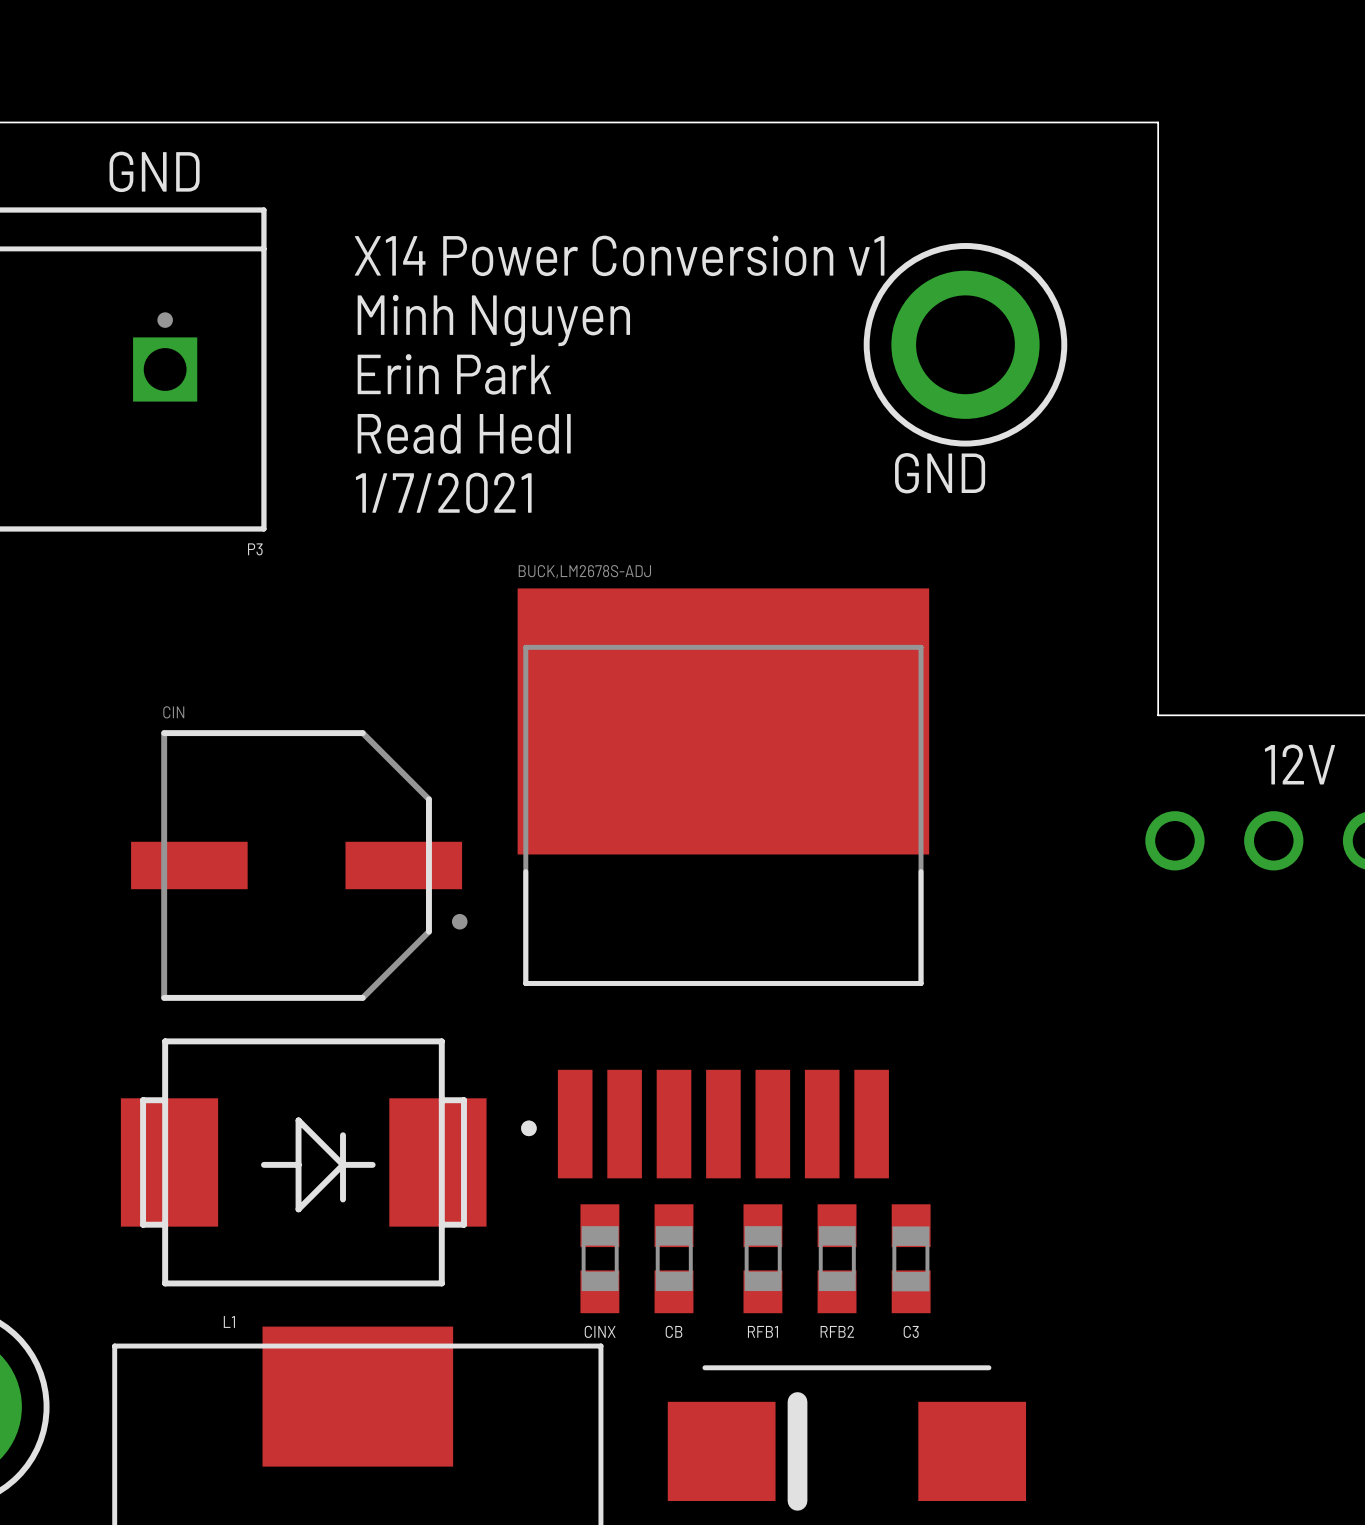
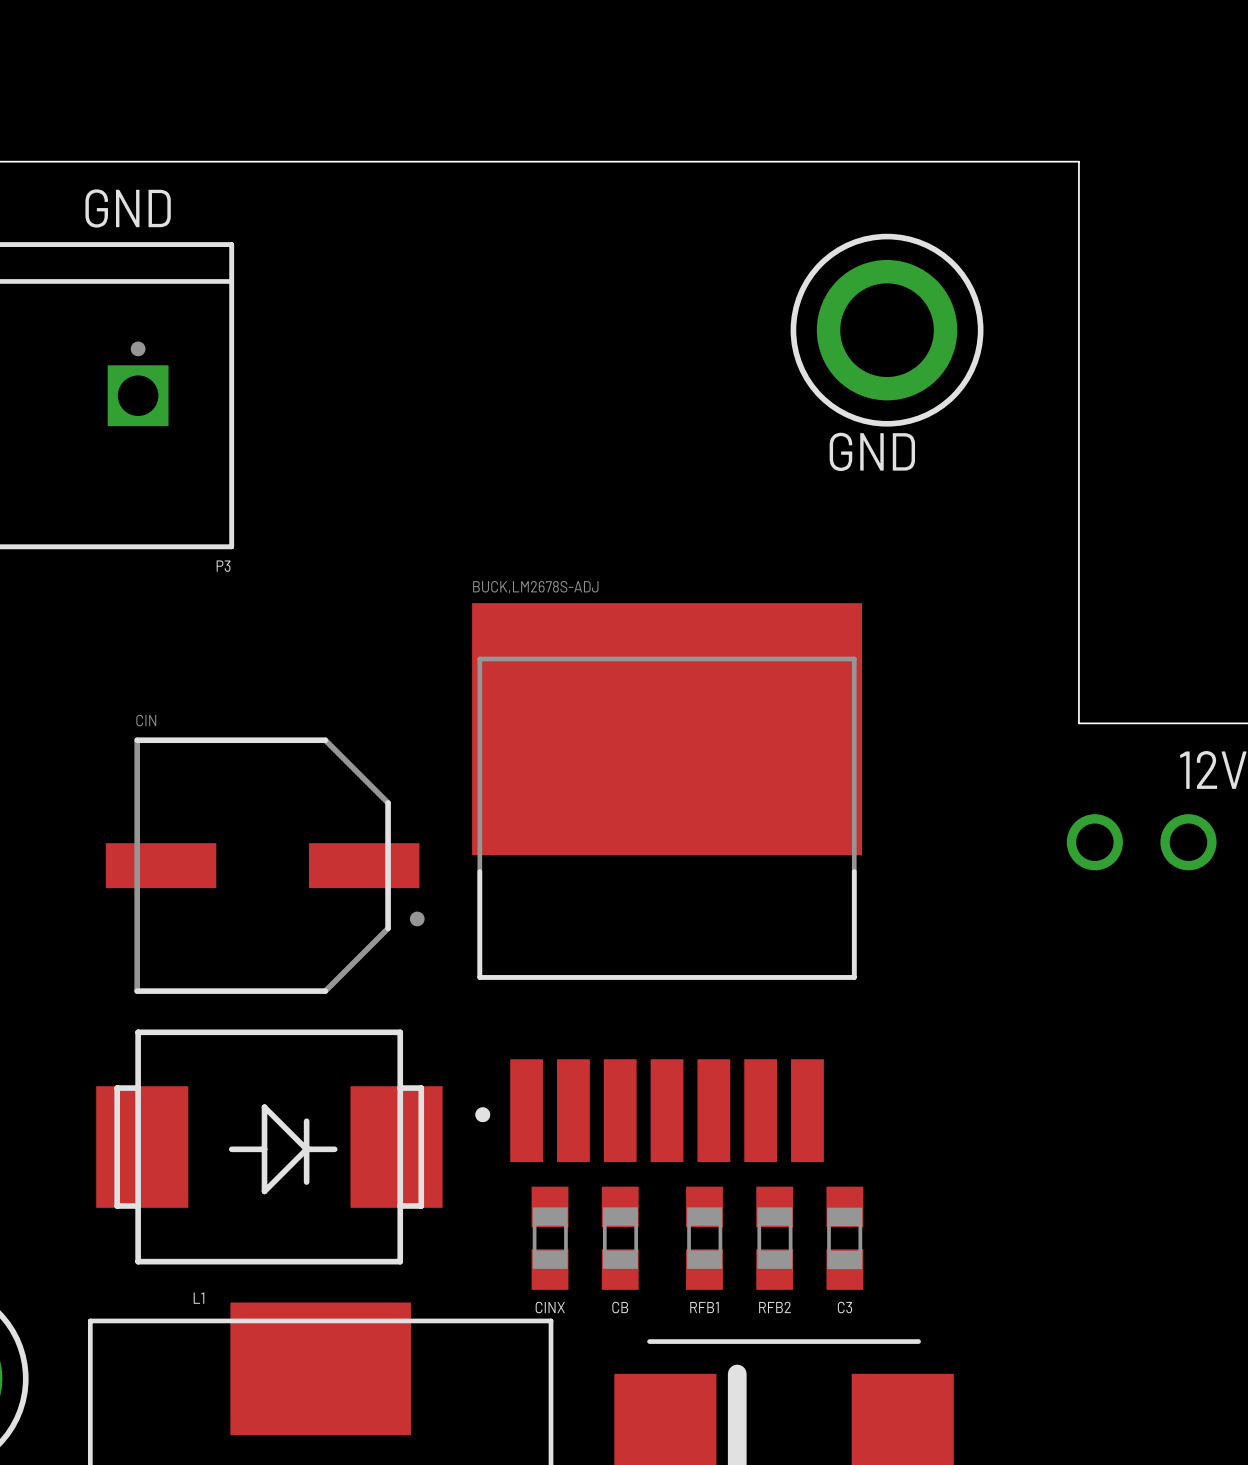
text: X14 Power Conversion v1 (619, 255) -> none
text: Minh Nguyen (493, 320) -> none
part position: (965, 344) -> (887, 330)
text: Erin Park (454, 374) -> none
text: Read Hedl (464, 433) -> none
text position: GND (940, 473) -> GND (872, 451)
text: 1/7/2021 (443, 493) -> none

